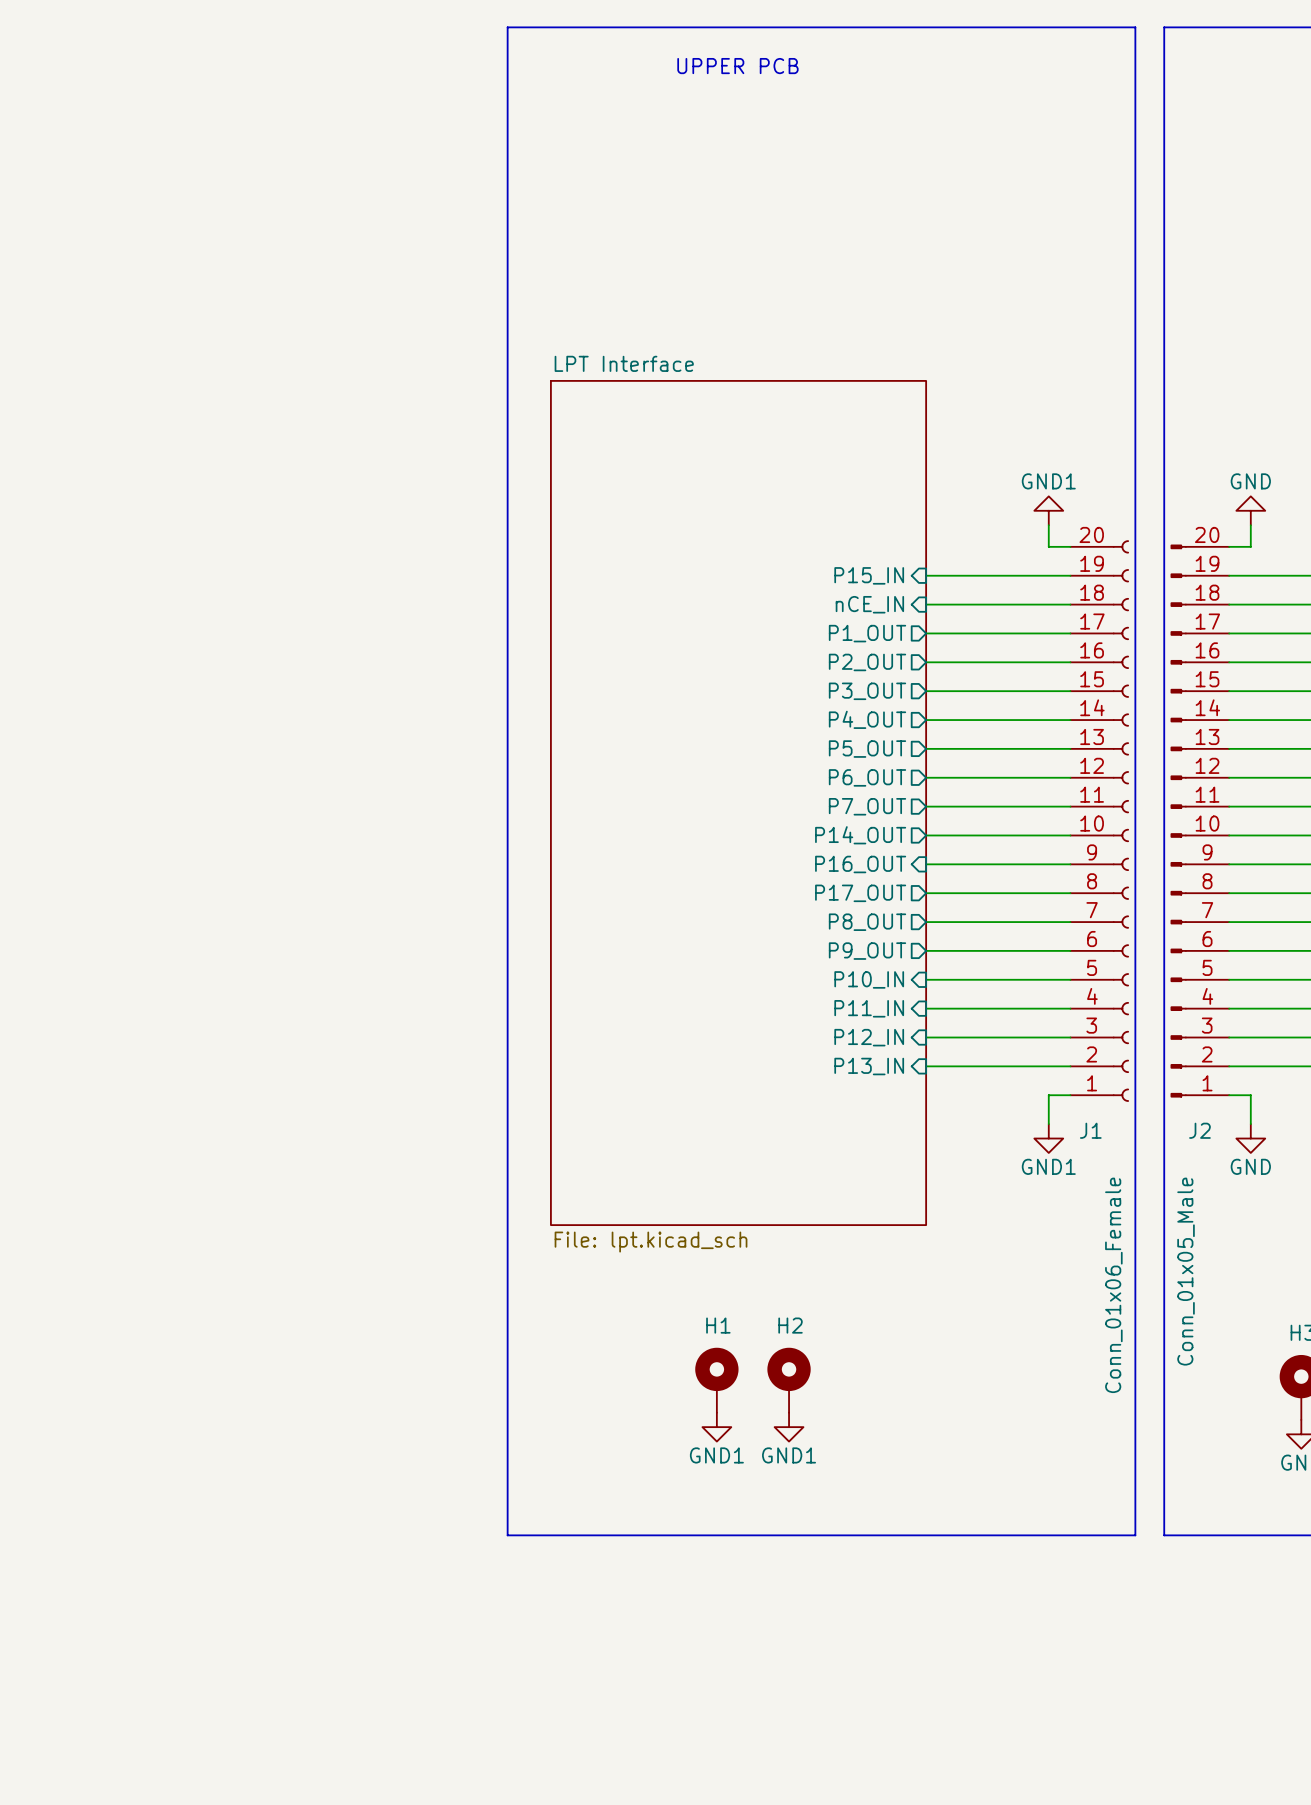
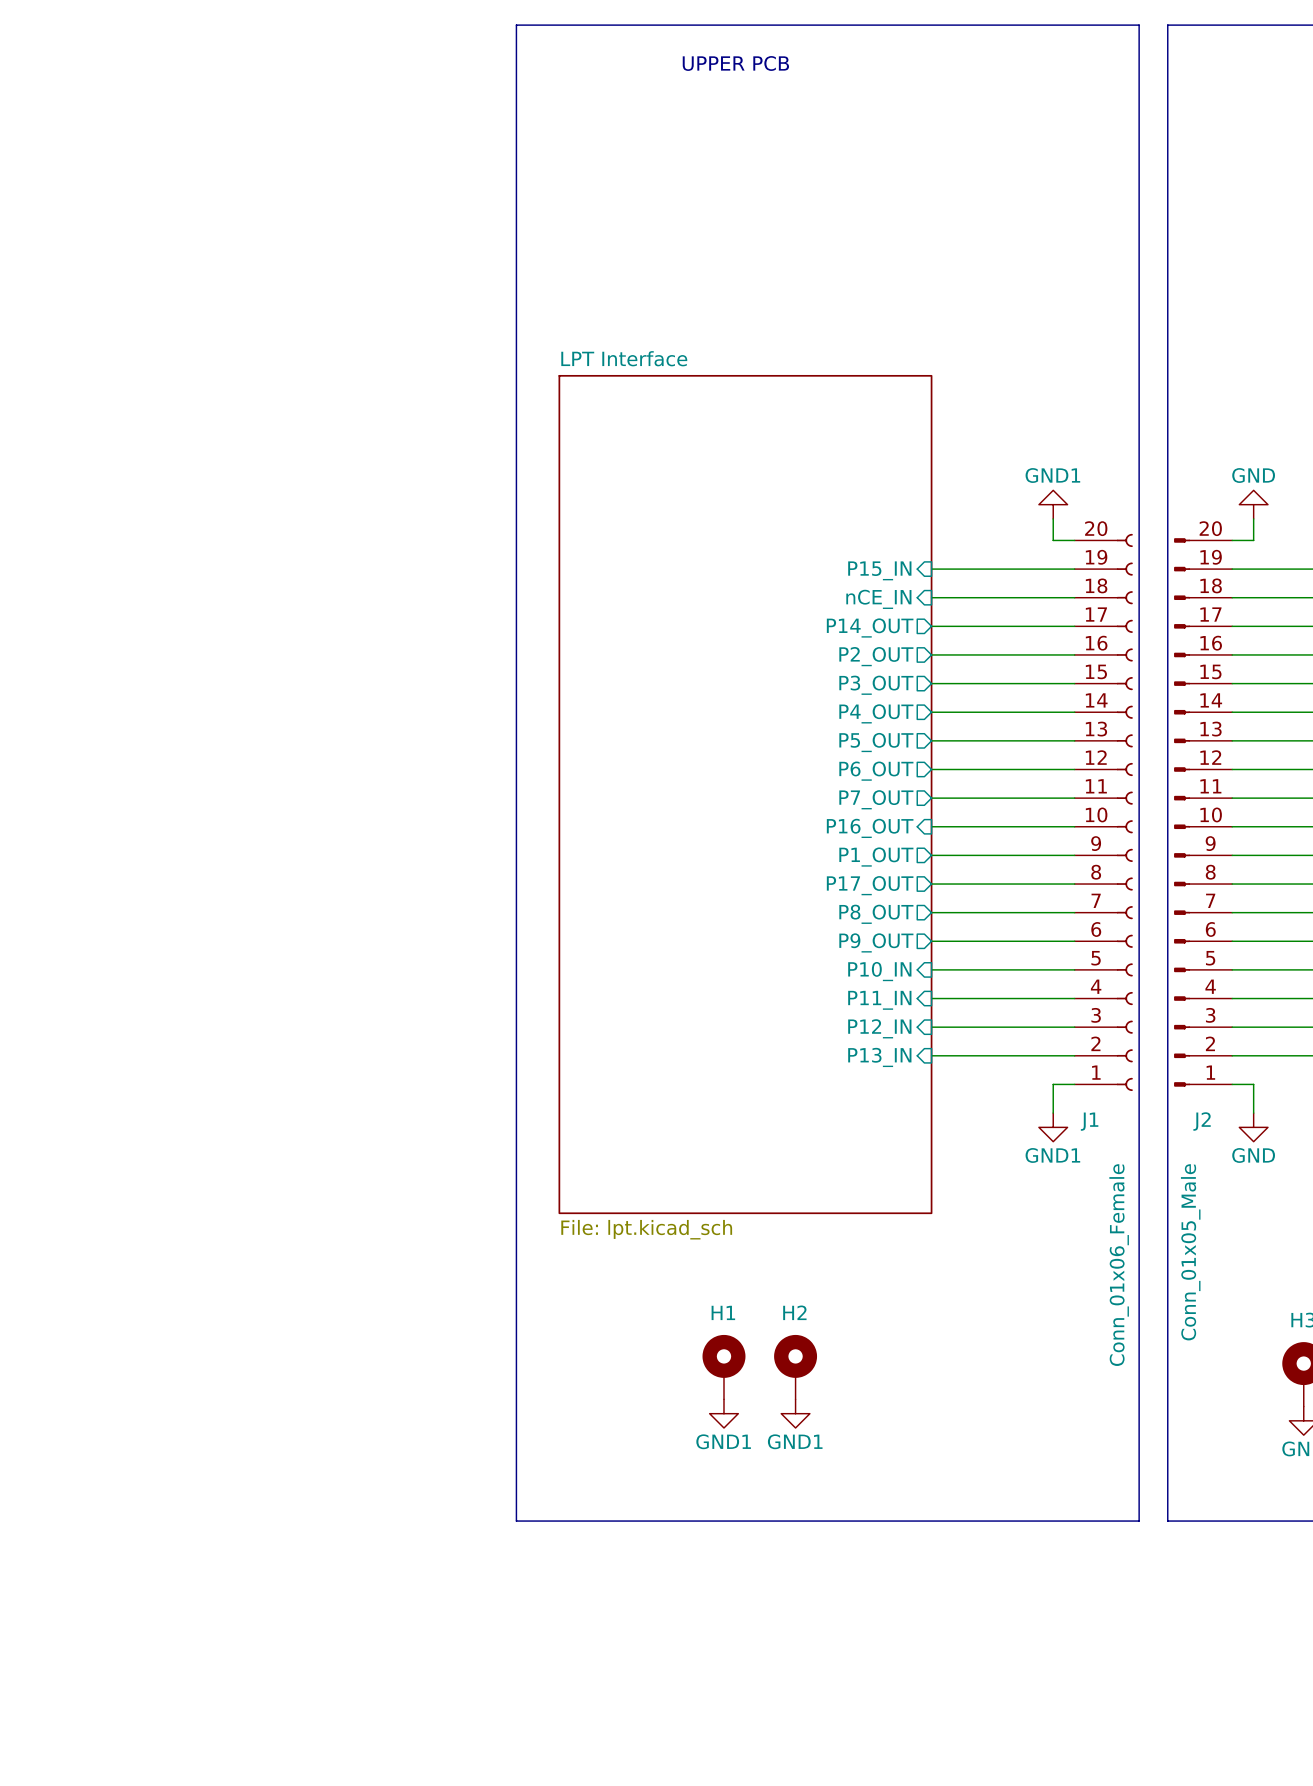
sheet pin: P1_OUT (867, 633) -> P14_OUT (870, 627)
sheet pin shape: output (860, 835) -> input (870, 828)
sheet pin: P14_OUT (860, 835) -> P16_OUT (870, 828)
sheet pin shape: input (860, 864) -> output (876, 857)
sheet pin: P16_OUT (860, 864) -> P1_OUT (876, 857)

